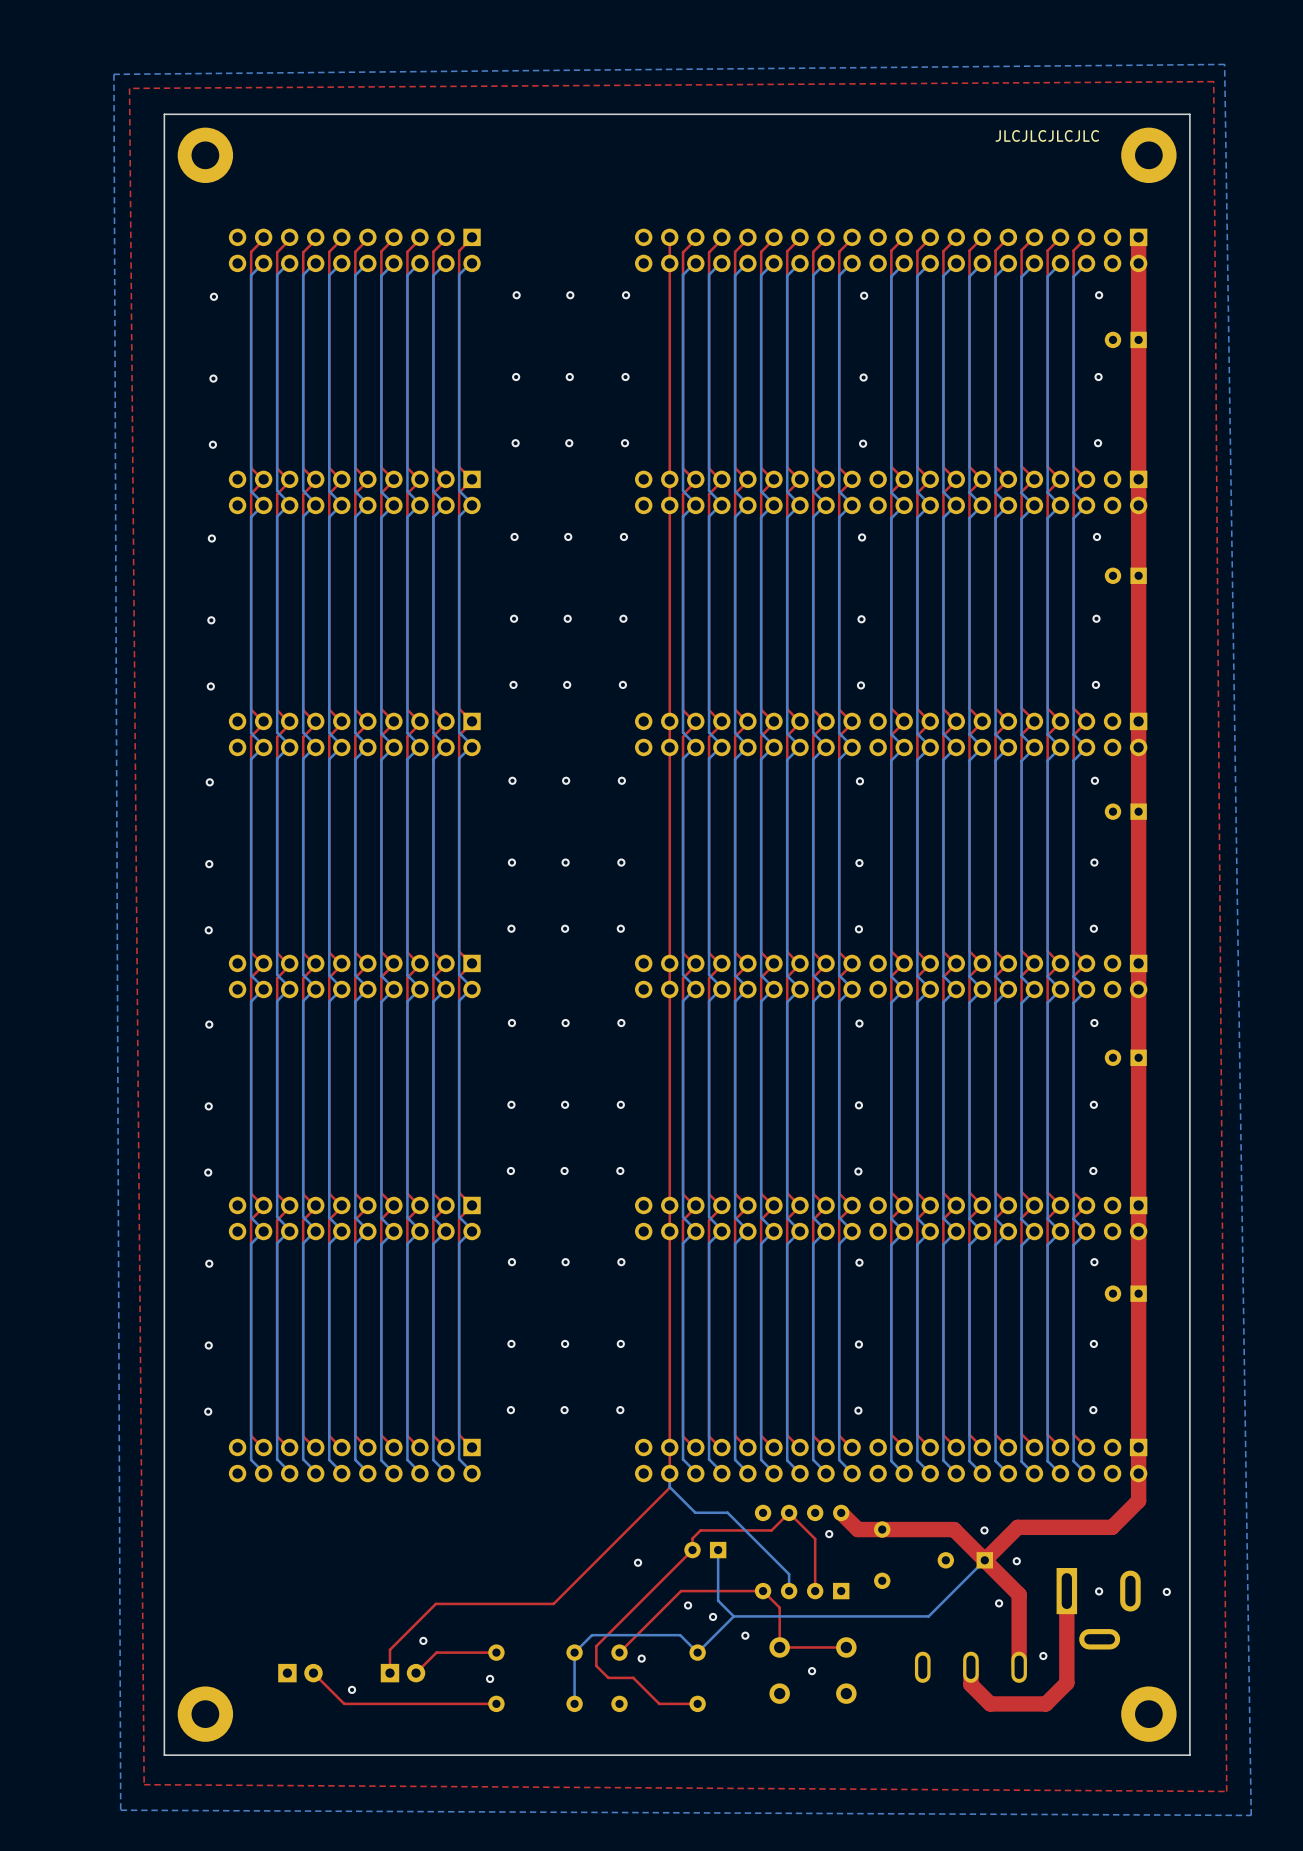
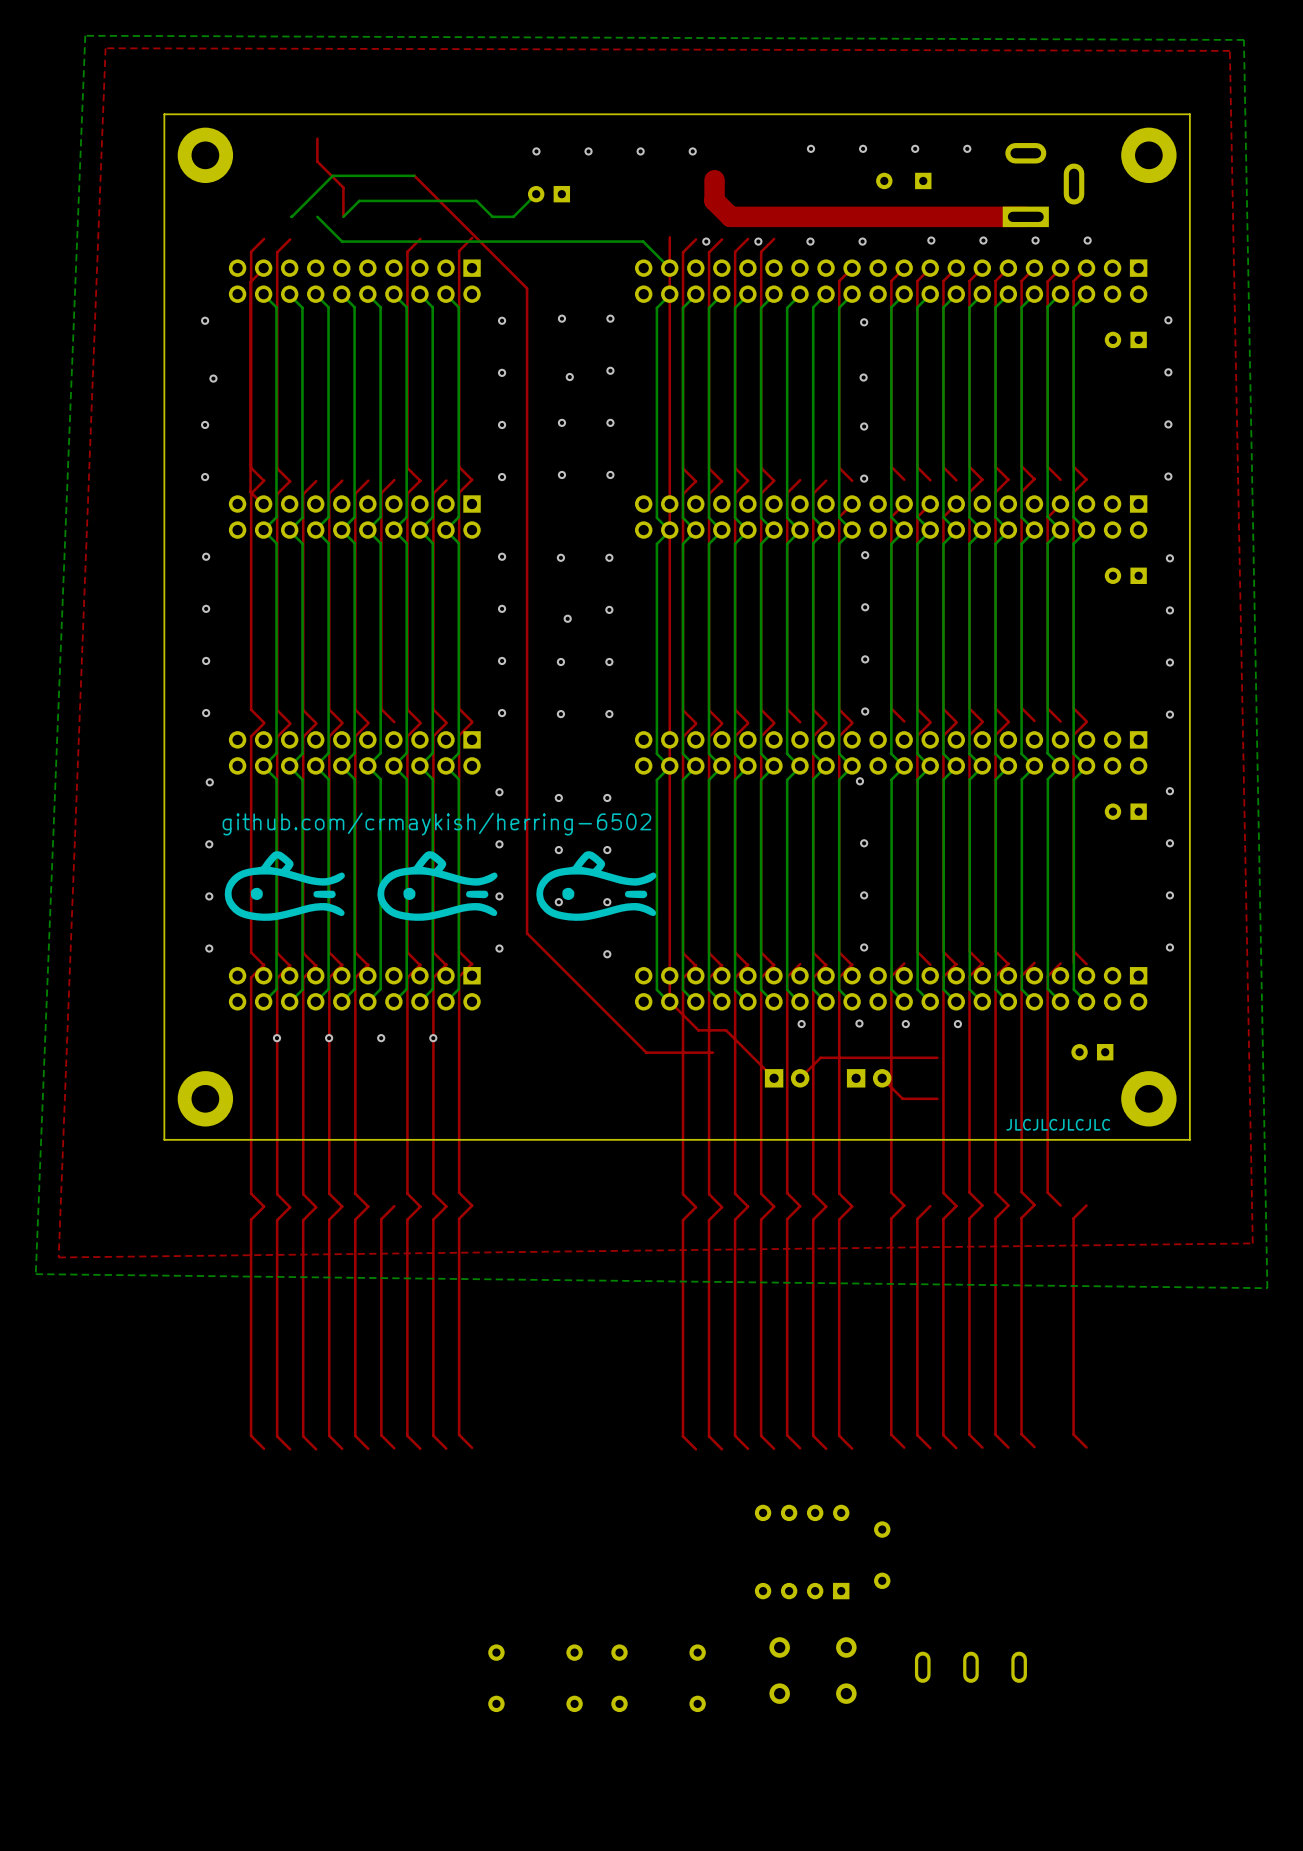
bottom zone outline: (1224, 64) (1251, 1815) (120, 1810) (113, 74) (1224, 64) -> (85, 35) (1243, 39) (1267, 1288) (35, 1274) (85, 35)
top zone outline: (1213, 81) (1226, 1791) (144, 1784) (129, 88) (1213, 81) -> (105, 48) (1229, 50) (1252, 1243) (58, 1257) (105, 48)
text: JLCJLCJLCJLC (1047, 135) -> none
top track: none -> (317, 138) (317, 161) (343, 187) (343, 216)
via: none -> (811, 148)
via: none -> (863, 148)
via: none -> (915, 148)
via: none -> (967, 148)
via: none -> (536, 151)
via: none -> (588, 151)
via: none -> (640, 151)
via: none -> (692, 151)
top track: none -> (414, 175) (527, 288) (527, 933) (646, 1052) (713, 1052)
bottom track: none -> (414, 175) (332, 175) (291, 216)
top track: none -> (714, 180) (714, 200) (730, 216) (1025, 216)
part: none -> (903, 180)
part: none -> (1043, 185)
bottom track: none -> (536, 194) (513, 216) (492, 216) (476, 200) (359, 200) (343, 216)
part: none -> (549, 194)
bottom track: none -> (317, 216) (342, 241) (643, 241) (669, 268)
top track: (904, 237) (891, 250) (891, 281) -> (904, 268) (891, 281)
top track: (982, 237) (969, 250) (969, 281) -> (982, 268) (969, 281)
top track: (1008, 237) (995, 250) (995, 281) -> (1008, 268) (995, 281)
top track: (1034, 237) (1021, 250) (1021, 281) -> (1034, 268) (1021, 281)
top track: (1060, 237) (1047, 250) (1047, 281) -> (1060, 268) (1047, 281)
top track: (1086, 237) (1073, 250) (1073, 281) -> (1086, 268) (1073, 281)
top track: (1138, 237) (1138, 1500) (1112, 1527) (1017, 1527) (984, 1560) -> none
top track: (342, 238) (329, 251) (329, 467) (342, 480) -> none
top track: (368, 238) (355, 251) (355, 467) (368, 480) -> none
top track: (394, 238) (381, 251) (381, 467) (394, 480) -> none
top track: (446, 238) (433, 251) (433, 467) (446, 480) -> none
top track: (800, 238) (787, 251) (787, 467) (800, 480) -> none
top track: (826, 238) (813, 251) (813, 467) (826, 480) -> none
top track: (852, 238) (839, 251) (839, 281) -> (852, 268) (839, 281)
top track: (930, 238) (917, 251) (917, 281) -> (930, 268) (917, 281)
top track: (956, 238) (943, 251) (943, 281) -> (956, 268) (943, 281)
top track: (316, 239) (303, 252) (303, 468) (316, 481) -> none
via: none -> (931, 240)
via: none -> (983, 240)
via: none -> (1035, 240)
via: none -> (1087, 240)
via: none -> (706, 241)
via: none -> (758, 241)
via: none -> (810, 241)
via: none -> (862, 241)
part position: (354, 250) -> (354, 281)
part position: (891, 250) -> (891, 281)
bottom track: (290, 261) (277, 274) (277, 490) (290, 503) -> none
bottom track: (316, 261) (303, 274) (303, 490) (316, 503) -> none
bottom track: (472, 261) (459, 274) (459, 490) (472, 503) -> none
bottom track: (695, 261) (683, 274) (683, 490) (695, 503) -> none
bottom track: (722, 261) (709, 274) (709, 490) (722, 503) -> none
bottom track: (264, 262) (251, 275) (251, 491) (264, 504) -> none
bottom track: (342, 262) (329, 275) (329, 491) (342, 504) -> none
bottom track: (368, 262) (355, 275) (355, 491) (368, 504) -> none
bottom track: (394, 262) (381, 275) (381, 491) (394, 504) -> none
bottom track: (420, 262) (407, 275) (407, 491) (420, 504) -> none
bottom track: (446, 262) (433, 275) (433, 491) (446, 504) -> none
bottom track: (748, 262) (735, 275) (735, 491) (748, 504) -> none
bottom track: (774, 262) (761, 275) (761, 491) (774, 504) -> none
bottom track: (800, 262) (787, 275) (787, 491) (800, 504) -> none
bottom track: (826, 262) (813, 275) (813, 491) (826, 504) -> none
bottom track: (852, 262) (839, 275) (839, 491) (852, 504) -> none
bottom track: (904, 263) (891, 276) (891, 307) -> (904, 294) (891, 307)
bottom track: (930, 263) (917, 275) (917, 307) -> (930, 294) (917, 307)
bottom track: (956, 263) (943, 275) (943, 307) -> (956, 294) (943, 307)
bottom track: (982, 263) (969, 276) (969, 307) -> (982, 294) (969, 307)
bottom track: (1008, 263) (995, 276) (995, 307) -> (1008, 294) (995, 307)
bottom track: (1060, 263) (1047, 276) (1047, 306) -> (1060, 293) (1047, 306)
bottom track: (1086, 263) (1073, 276) (1073, 307) -> (1086, 294) (1073, 307)
bottom track: (1034, 264) (1021, 277) (1021, 307) -> (1034, 294) (1021, 307)
top track: none -> (263, 269) (250, 282) (250, 492) (263, 505)
bottom track: none -> (263, 294) (276, 307) (276, 517) (263, 530)
bottom track: none -> (289, 294) (302, 307) (302, 517) (289, 530)
bottom track: none -> (315, 294) (328, 307) (328, 517) (315, 530)
bottom track: none -> (341, 294) (354, 307) (354, 517) (341, 530)
bottom track: none -> (367, 294) (380, 307) (380, 517) (367, 530)
bottom track: none -> (393, 294) (406, 307) (406, 517) (393, 530)
bottom track: none -> (419, 294) (432, 307) (432, 517) (419, 530)
bottom track: none -> (445, 294) (458, 307) (458, 517) (445, 530)
bottom track: none -> (669, 294) (656, 307) (656, 517) (669, 530)
bottom track: none -> (695, 294) (682, 307) (682, 517) (695, 530)
bottom track: none -> (721, 294) (709, 307) (709, 517) (721, 530)
bottom track: none -> (748, 294) (735, 307) (735, 517) (748, 530)
bottom track: none -> (774, 294) (761, 307) (761, 517) (774, 530)
bottom track: none -> (800, 294) (787, 307) (787, 517) (800, 530)
bottom track: none -> (826, 294) (813, 307) (813, 517) (826, 530)
bottom track: none -> (852, 294) (839, 307) (839, 517) (852, 530)
via: (516, 295) -> none
via: (570, 295) -> none
via: (626, 295) -> none
via position: (864, 295) -> (864, 322)
via: (1099, 295) -> none
via position: (213, 296) -> (205, 320)
via: none -> (561, 318)
via: none -> (610, 318)
via: none -> (502, 320)
via: none -> (1168, 320)
via: none -> (1168, 372)
via position: (516, 377) -> (502, 372)
via position: (625, 377) -> (610, 370)
via: (1098, 377) -> none
via: none -> (561, 422)
via: none -> (610, 422)
via: none -> (205, 424)
via: none -> (502, 424)
via: none -> (1168, 424)
via: (515, 443) -> none
via: (569, 443) -> none
via: (625, 443) -> none
via position: (863, 443) -> (864, 426)
via: (1098, 443) -> none
via: (212, 444) -> none
via: none -> (561, 474)
via: none -> (610, 474)
via: none -> (1168, 476)
via: none -> (205, 477)
via: none -> (502, 477)
via: none -> (864, 478)
top track: (904, 479) (891, 492) (891, 517) -> (904, 504) (891, 517)
top track: (1060, 479) (1047, 492) (1047, 517) -> (1060, 504) (1047, 517)
top track: (852, 480) (839, 493) (839, 517) -> (852, 504) (839, 517)
top track: (930, 480) (917, 492) (917, 517) -> (930, 504) (917, 517)
top track: (956, 480) (943, 492) (943, 517) -> (956, 504) (943, 517)
part position: (354, 492) -> (354, 517)
bottom track: (891, 492) (904, 505) -> (891, 492) (891, 517) (904, 530)
part position: (891, 492) -> (891, 517)
bottom track: (917, 492) (930, 505) -> (917, 492) (917, 517) (930, 530)
bottom track: (943, 492) (956, 505) -> (943, 492) (943, 517) (956, 530)
bottom track: (969, 492) (982, 505) -> (969, 492) (969, 517) (982, 530)
bottom track: (995, 492) (1008, 505) -> (995, 492) (995, 517) (1008, 530)
bottom track: (1047, 492) (1060, 505) -> (1047, 492) (1047, 516) (1060, 529)
bottom track: (1073, 492) (1086, 505) -> (1073, 492) (1073, 517) (1086, 530)
bottom track: (1021, 493) (1034, 506) -> (1021, 493) (1021, 517) (1034, 530)
bottom track: (290, 503) (277, 516) (277, 732) (290, 745) -> none
bottom track: (316, 503) (303, 516) (303, 732) (316, 745) -> none
bottom track: (472, 503) (459, 516) (459, 732) (472, 745) -> none
bottom track: (695, 503) (683, 516) (683, 732) (695, 745) -> none
bottom track: (722, 503) (709, 516) (709, 732) (722, 745) -> none
bottom track: (264, 504) (251, 517) (251, 733) (264, 746) -> none
bottom track: (342, 504) (329, 517) (329, 733) (342, 746) -> none
bottom track: (368, 504) (355, 517) (355, 733) (368, 746) -> none
bottom track: (394, 504) (381, 517) (381, 733) (394, 746) -> none
bottom track: (420, 504) (407, 517) (407, 733) (420, 746) -> none
bottom track: (446, 504) (433, 517) (433, 733) (446, 746) -> none
bottom track: (748, 504) (735, 517) (735, 733) (748, 746) -> none
bottom track: (774, 504) (761, 517) (761, 733) (774, 746) -> none
bottom track: (800, 504) (787, 517) (787, 733) (800, 746) -> none
bottom track: (826, 504) (813, 517) (813, 733) (826, 746) -> none
bottom track: (852, 504) (839, 517) (839, 733) (852, 746) -> none
bottom track: (930, 504) (917, 517) (917, 543) -> (930, 530) (917, 543)
bottom track: (956, 504) (943, 517) (943, 543) -> (956, 530) (943, 543)
bottom track: (904, 505) (891, 518) (891, 543) -> (904, 530) (891, 543)
bottom track: (982, 505) (969, 518) (969, 543) -> (982, 530) (969, 543)
bottom track: (1008, 505) (995, 518) (995, 543) -> (1008, 530) (995, 543)
bottom track: (1034, 505) (1021, 518) (1021, 543) -> (1034, 530) (1021, 543)
bottom track: (1060, 505) (1047, 518) (1047, 543) -> (1060, 530) (1047, 543)
bottom track: (1086, 505) (1073, 518) (1073, 543) -> (1086, 530) (1073, 543)
bottom track: none -> (263, 530) (276, 543) (276, 753) (263, 766)
bottom track: none -> (289, 530) (302, 543) (302, 753) (289, 766)
bottom track: none -> (315, 530) (328, 543) (328, 753) (315, 766)
bottom track: none -> (341, 530) (354, 543) (354, 753) (341, 766)
bottom track: none -> (367, 530) (380, 543) (380, 753) (367, 766)
bottom track: none -> (393, 530) (406, 543) (406, 753) (393, 766)
bottom track: none -> (419, 530) (432, 543) (432, 753) (419, 766)
bottom track: none -> (445, 530) (458, 543) (458, 753) (445, 766)
bottom track: none -> (669, 530) (656, 543) (656, 753) (669, 766)
bottom track: none -> (695, 530) (682, 543) (682, 753) (695, 766)
bottom track: none -> (721, 530) (709, 543) (709, 753) (721, 766)
bottom track: none -> (748, 530) (735, 543) (735, 753) (748, 766)
bottom track: none -> (774, 530) (761, 543) (761, 753) (774, 766)
bottom track: none -> (800, 530) (787, 543) (787, 753) (800, 766)
bottom track: none -> (826, 530) (813, 543) (813, 753) (826, 766)
bottom track: none -> (852, 530) (839, 543) (839, 753) (852, 766)
via position: (514, 536) -> (502, 556)
via position: (568, 536) -> (560, 557)
via: (623, 536) -> none
via: (1097, 536) -> none
via position: (862, 537) -> (865, 555)
via position: (211, 538) -> (206, 556)
via: none -> (609, 557)
via: none -> (1169, 558)
via: none -> (1169, 610)
via position: (514, 618) -> (502, 608)
via position: (623, 618) -> (609, 609)
via: (1096, 618) -> none
via position: (861, 619) -> (865, 607)
via position: (211, 620) -> (206, 608)
via: none -> (865, 659)
via: none -> (206, 660)
via: none -> (502, 660)
via: none -> (560, 662)
via: none -> (609, 662)
via: none -> (1169, 662)
via: (513, 684) -> none
via: (567, 684) -> none
via: (622, 684) -> none
via: (1095, 684) -> none
via: (861, 685) -> none
via: (210, 686) -> none
via: none -> (865, 711)
via: none -> (206, 713)
via: none -> (502, 713)
via: none -> (560, 714)
via: none -> (609, 714)
via: none -> (1169, 714)
top track: (1034, 721) (1021, 734) (1021, 950) (1034, 963) -> none
top track: (394, 722) (381, 735) (381, 951) (394, 964) -> none
top track: (800, 722) (787, 735) (787, 951) (800, 964) -> none
top track: (904, 722) (891, 735) (891, 951) (904, 964) -> none
top track: (1060, 722) (1047, 735) (1047, 951) (1060, 964) -> none
bottom track: (917, 733) (930, 746) -> (917, 733) (917, 753) (930, 766)
bottom track: (943, 733) (956, 746) -> (943, 733) (943, 753) (956, 766)
part position: (354, 734) -> (354, 752)
bottom track: (891, 734) (904, 747) -> (891, 734) (891, 753) (904, 766)
part position: (891, 734) -> (891, 752)
bottom track: (969, 734) (982, 747) -> (969, 734) (969, 753) (982, 766)
bottom track: (995, 734) (1008, 747) -> (995, 734) (995, 753) (1008, 766)
bottom track: (1021, 734) (1034, 747) -> (1021, 734) (1021, 753) (1034, 766)
bottom track: (1047, 734) (1060, 747) -> (1047, 734) (1047, 753) (1060, 766)
bottom track: (1073, 734) (1086, 747) -> (1073, 734) (1073, 753) (1086, 766)
bottom track: (290, 745) (277, 758) (277, 974) (290, 987) -> none
bottom track: (316, 745) (303, 758) (303, 974) (316, 987) -> none
bottom track: (472, 745) (459, 758) (459, 974) (472, 987) -> none
bottom track: (695, 745) (683, 758) (683, 974) (695, 987) -> none
bottom track: (722, 745) (709, 758) (709, 974) (722, 987) -> none
bottom track: (264, 746) (251, 759) (251, 975) (264, 988) -> none
bottom track: (342, 746) (329, 759) (329, 975) (342, 988) -> none
bottom track: (368, 746) (355, 759) (355, 975) (368, 988) -> none
bottom track: (394, 746) (381, 759) (381, 975) (394, 988) -> none
bottom track: (420, 746) (407, 759) (407, 975) (420, 988) -> none
bottom track: (446, 746) (433, 759) (433, 975) (446, 988) -> none
bottom track: (748, 746) (735, 759) (735, 975) (748, 988) -> none
bottom track: (774, 746) (761, 759) (761, 975) (774, 988) -> none
bottom track: (800, 746) (787, 759) (787, 975) (800, 988) -> none
bottom track: (826, 746) (813, 759) (813, 975) (826, 988) -> none
bottom track: (852, 746) (839, 759) (839, 975) (852, 988) -> none
bottom track: (904, 747) (891, 760) (891, 976) (904, 989) -> none
bottom track: (930, 747) (917, 759) (917, 976) (930, 989) -> none
bottom track: (956, 747) (943, 759) (943, 976) (956, 989) -> none
bottom track: (982, 747) (969, 760) (969, 976) (982, 989) -> none
bottom track: (1008, 747) (995, 760) (995, 976) (1008, 989) -> none
bottom track: (1060, 747) (1047, 760) (1047, 976) (1060, 989) -> none
bottom track: (1086, 747) (1073, 760) (1073, 976) (1086, 989) -> none
bottom track: (1034, 748) (1021, 761) (1021, 977) (1034, 990) -> none
bottom track: none -> (263, 766) (276, 779) (276, 989) (263, 1002)
bottom track: none -> (289, 766) (302, 779) (302, 989) (289, 1002)
bottom track: none -> (315, 766) (328, 779) (328, 989) (315, 1002)
bottom track: none -> (341, 766) (354, 779) (354, 989) (341, 1002)
bottom track: none -> (367, 766) (380, 779) (380, 989) (367, 1002)
bottom track: none -> (393, 766) (406, 779) (406, 989) (393, 1002)
bottom track: none -> (419, 766) (432, 779) (432, 989) (419, 1002)
bottom track: none -> (445, 766) (458, 779) (458, 989) (445, 1002)
bottom track: none -> (669, 766) (656, 779) (656, 989) (669, 1002)
bottom track: none -> (695, 766) (682, 779) (682, 989) (695, 1002)
bottom track: none -> (721, 766) (709, 779) (709, 989) (721, 1002)
bottom track: none -> (748, 766) (735, 779) (735, 989) (748, 1002)
bottom track: none -> (774, 766) (761, 779) (761, 989) (774, 1002)
bottom track: none -> (800, 766) (787, 779) (787, 989) (800, 1002)
bottom track: none -> (826, 766) (813, 779) (813, 989) (826, 1002)
bottom track: none -> (852, 766) (839, 779) (839, 989) (852, 1002)
bottom track: none -> (904, 766) (891, 779) (891, 989) (904, 1002)
bottom track: none -> (930, 766) (917, 779) (917, 989) (930, 1002)
bottom track: none -> (956, 766) (943, 779) (943, 989) (956, 1002)
bottom track: none -> (982, 766) (969, 779) (969, 989) (982, 1002)
bottom track: none -> (1008, 766) (995, 779) (995, 989) (1008, 1002)
bottom track: none -> (1034, 766) (1021, 779) (1021, 989) (1034, 1002)
bottom track: none -> (1060, 766) (1047, 779) (1047, 989) (1060, 1002)
bottom track: none -> (1086, 766) (1073, 779) (1073, 989) (1086, 1002)
via position: (512, 780) -> (499, 792)
via position: (566, 780) -> (558, 797)
via: (621, 780) -> none
via: (1094, 780) -> none
via: none -> (1169, 791)
via: none -> (607, 797)
text: none -> github.com/crmaykish/herring-6502 (436, 824)
via: none -> (864, 843)
via: none -> (1169, 843)
via: none -> (209, 844)
via: none -> (499, 844)
drawing: none -> [224, 851, 345, 921]
drawing: none -> [377, 851, 498, 921]
drawing: none -> [536, 851, 657, 921]
via: (511, 862) -> none
via position: (565, 862) -> (558, 850)
via position: (621, 862) -> (607, 850)
via: (1094, 862) -> none
via: (859, 863) -> none
via: (209, 864) -> none
via: none -> (864, 895)
via: none -> (1169, 895)
via: none -> (209, 896)
via: none -> (499, 896)
via: none -> (558, 902)
via: none -> (607, 902)
via: (511, 928) -> none
via: (565, 928) -> none
via: (620, 928) -> none
via: (1093, 928) -> none
via: (858, 929) -> none
via: (208, 930) -> none
via: none -> (864, 947)
via: none -> (1169, 947)
via: none -> (209, 948)
via: none -> (499, 948)
via: none -> (607, 954)
top track: (930, 963) (917, 976) (917, 1193) (930, 1206) -> none
top track: (1086, 963) (1073, 976) (1073, 1192) (1086, 1205) -> none
top track: (394, 964) (381, 977) (381, 1193) (394, 1206) -> none
part position: (354, 976) -> (354, 988)
part position: (891, 976) -> (891, 988)
bottom track: (472, 987) (459, 1000) (459, 1217) (472, 1229) -> none
bottom track: (264, 988) (251, 1001) (251, 1217) (264, 1230) -> none
bottom track: (290, 988) (277, 1001) (277, 1217) (290, 1230) -> none
bottom track: (316, 988) (303, 1001) (303, 1217) (316, 1230) -> none
bottom track: (342, 988) (329, 1001) (329, 1217) (342, 1230) -> none
bottom track: (368, 988) (355, 1001) (355, 1217) (368, 1230) -> none
bottom track: (420, 988) (407, 1001) (407, 1217) (420, 1230) -> none
bottom track: (446, 988) (433, 1001) (433, 1217) (446, 1230) -> none
bottom track: (695, 988) (683, 1001) (683, 1217) (695, 1230) -> none
bottom track: (722, 988) (709, 1001) (709, 1217) (722, 1230) -> none
bottom track: (748, 988) (735, 1001) (735, 1217) (748, 1230) -> none
bottom track: (774, 988) (761, 1001) (761, 1217) (774, 1230) -> none
bottom track: (826, 988) (813, 1001) (813, 1217) (826, 1230) -> none
bottom track: (852, 988) (839, 1001) (839, 1217) (852, 1230) -> none
bottom track: (394, 989) (381, 1002) (381, 1218) (394, 1231) -> none
bottom track: (800, 989) (787, 1002) (787, 1218) (800, 1231) -> none
bottom track: (904, 989) (891, 1002) (891, 1218) (904, 1231) -> none
bottom track: (930, 989) (917, 1002) (917, 1218) (930, 1231) -> none
bottom track: (956, 989) (943, 1002) (943, 1218) (956, 1231) -> none
bottom track: (982, 989) (969, 1002) (969, 1218) (982, 1231) -> none
bottom track: (1008, 989) (995, 1002) (995, 1218) (1008, 1231) -> none
bottom track: (1060, 989) (1047, 1002) (1047, 1218) (1060, 1231) -> none
bottom track: (1086, 989) (1073, 1002) (1073, 1218) (1086, 1231) -> none
bottom track: (1034, 990) (1021, 1003) (1021, 1219) (1034, 1232) -> none
top track: (669, 1001) (669, 1487) (553, 1603) (435, 1603) (389, 1649) (389, 1673) -> (669, 1001) (698, 1030) (726, 1030) (774, 1078)
via: (511, 1023) -> none
via: (565, 1023) -> none
via: (621, 1023) -> none
via: (1094, 1023) -> none
via: (209, 1024) -> none
via: none -> (801, 1024)
via: none -> (905, 1024)
via: none -> (957, 1024)
via: none -> (277, 1038)
via: none -> (329, 1038)
via: none -> (381, 1038)
via: none -> (433, 1038)
top track: none -> (937, 1057) (820, 1057) (800, 1078)
part position: (1125, 1057) -> (1092, 1052)
part: none -> (787, 1078)
part: none -> (869, 1078)
top track: none -> (882, 1078) (902, 1098) (937, 1098)
part: none -> (205, 1098)
part: none -> (1148, 1098)
via: (511, 1104) -> none
via: (565, 1104) -> none
via: (620, 1104) -> none
via: (1093, 1104) -> none
via: (858, 1105) -> none
via: (208, 1106) -> none
text: none -> JLCJLCJLCJLC (1058, 1124)
board edge: (1189, 1139) (1189, 1755) (164, 1755) (164, 1139) -> (1189, 1139) (164, 1139)
via: (510, 1170) -> none
via: (564, 1170) -> none
via: (620, 1170) -> none
via: (1093, 1170) -> none
via: (858, 1171) -> none
via: (208, 1172) -> none
top track: (1060, 1205) (1047, 1218) (1047, 1434) (1060, 1447) -> none
part: (354, 1218) -> none
part: (891, 1218) -> none
bottom track: (264, 1230) (251, 1243) (251, 1459) (264, 1472) -> none
bottom track: (290, 1230) (277, 1243) (277, 1459) (290, 1472) -> none
bottom track: (316, 1230) (303, 1243) (303, 1459) (316, 1472) -> none
bottom track: (342, 1230) (329, 1243) (329, 1459) (342, 1472) -> none
bottom track: (368, 1230) (355, 1243) (355, 1459) (368, 1472) -> none
bottom track: (420, 1230) (407, 1243) (407, 1459) (420, 1472) -> none
bottom track: (472, 1230) (459, 1243) (459, 1459) (472, 1472) -> none
bottom track: (695, 1230) (683, 1243) (683, 1459) (695, 1472) -> none
bottom track: (722, 1230) (709, 1243) (709, 1459) (722, 1472) -> none
bottom track: (748, 1230) (735, 1243) (735, 1459) (748, 1472) -> none
bottom track: (774, 1230) (761, 1243) (761, 1459) (774, 1472) -> none
bottom track: (826, 1230) (813, 1243) (813, 1459) (826, 1472) -> none
bottom track: (394, 1231) (381, 1244) (381, 1460) (394, 1473) -> none
bottom track: (446, 1231) (433, 1243) (433, 1460) (446, 1473) -> none
bottom track: (800, 1231) (787, 1244) (787, 1460) (800, 1473) -> none
bottom track: (852, 1231) (839, 1243) (839, 1460) (852, 1473) -> none
bottom track: (930, 1231) (917, 1244) (917, 1460) (930, 1473) -> none
bottom track: (956, 1231) (943, 1244) (943, 1460) (956, 1473) -> none
bottom track: (904, 1232) (891, 1245) (891, 1461) (904, 1474) -> none
bottom track: (982, 1232) (969, 1245) (969, 1461) (982, 1474) -> none
bottom track: (1008, 1232) (995, 1245) (995, 1461) (1008, 1474) -> none
bottom track: (1034, 1232) (1021, 1245) (1021, 1461) (1034, 1474) -> none
bottom track: (1060, 1232) (1047, 1245) (1047, 1461) (1060, 1474) -> none
bottom track: (1086, 1232) (1073, 1245) (1073, 1461) (1086, 1474) -> none
via: (511, 1262) -> none
via: (565, 1262) -> none
via: (621, 1262) -> none
via: (859, 1262) -> none
via: (1094, 1262) -> none
via: (209, 1263) -> none
part: (1125, 1293) -> none
via: (511, 1343) -> none
via: (565, 1343) -> none
via: (620, 1343) -> none
via: (1093, 1343) -> none
via: (858, 1344) -> none
via: (208, 1345) -> none
via: (510, 1410) -> none
via: (564, 1410) -> none
via: (620, 1410) -> none
via: (858, 1410) -> none
via: (1093, 1410) -> none
via: (208, 1411) -> none
part: (354, 1460) -> none
part: (891, 1460) -> none
bottom track: (669, 1473) (669, 1487) (695, 1512) (727, 1512) (789, 1574) (789, 1591) -> none
top track: (841, 1512) (857, 1529) (954, 1529) (1019, 1594) (1019, 1667) -> none
via: (984, 1530) -> none
via: (829, 1534) -> none
part: (705, 1550) -> none
bottom track: (718, 1550) (718, 1600) (733, 1616) -> none
part: (965, 1560) -> none
bottom track: (984, 1560) (928, 1616) (733, 1616) -> none
via: (1016, 1561) -> none
via: (638, 1562) -> none
top track: (815, 1591) (815, 1538) (789, 1512) (771, 1530) (700, 1530) (692, 1538) (692, 1550) (596, 1646) (596, 1665) (608, 1677) (633, 1677) (659, 1703) (697, 1703) -> none
top track: (1066, 1591) (1066, 1683) (1045, 1703) (990, 1703) (970, 1684) (970, 1667) -> none
via: (1099, 1591) -> none
via: (1166, 1591) -> none
via: (999, 1603) -> none
via: (688, 1605) -> none
part: (1098, 1608) -> none
via: (713, 1616) -> none
bottom track: (733, 1616) (697, 1652) (680, 1635) (592, 1635) (574, 1652) -> none
via: (745, 1635) -> none
via: (423, 1640) -> none
top track: (846, 1647) (779, 1647) (779, 1607) (763, 1591) (681, 1591) (619, 1652) -> none
top track: (496, 1652) (436, 1652) (416, 1673) -> none
bottom track: (574, 1656) (574, 1703) -> none
via: (1043, 1656) -> none
via: (641, 1658) -> none
via: (812, 1671) -> none
part: (300, 1673) -> none
top track: (313, 1673) (344, 1703) (496, 1703) -> none
part: (403, 1673) -> none
via: (490, 1678) -> none
via: (352, 1689) -> none
part: (205, 1714) -> none
part: (1148, 1714) -> none

